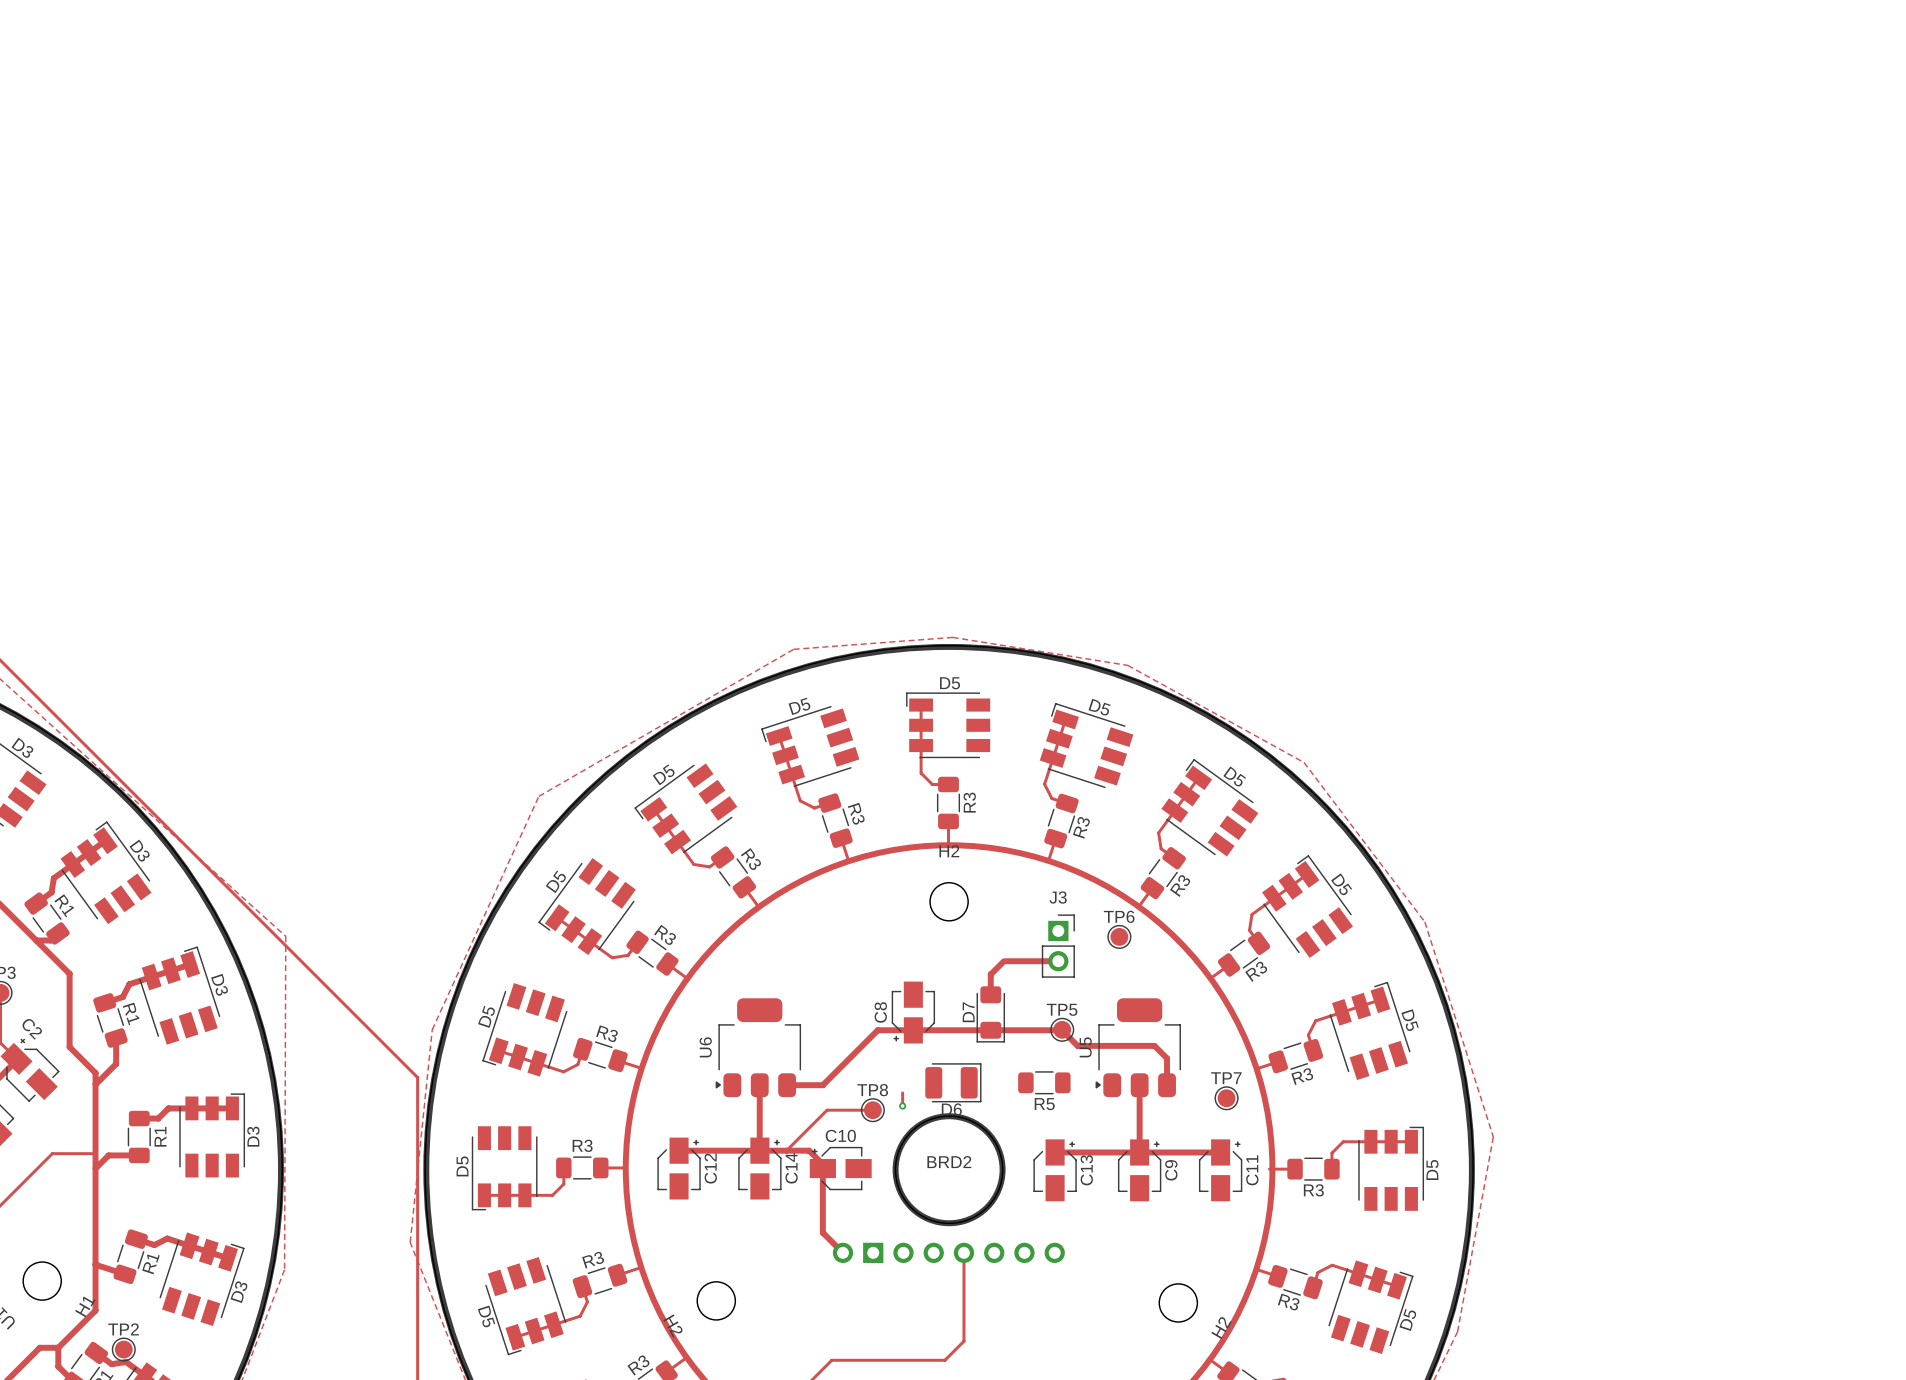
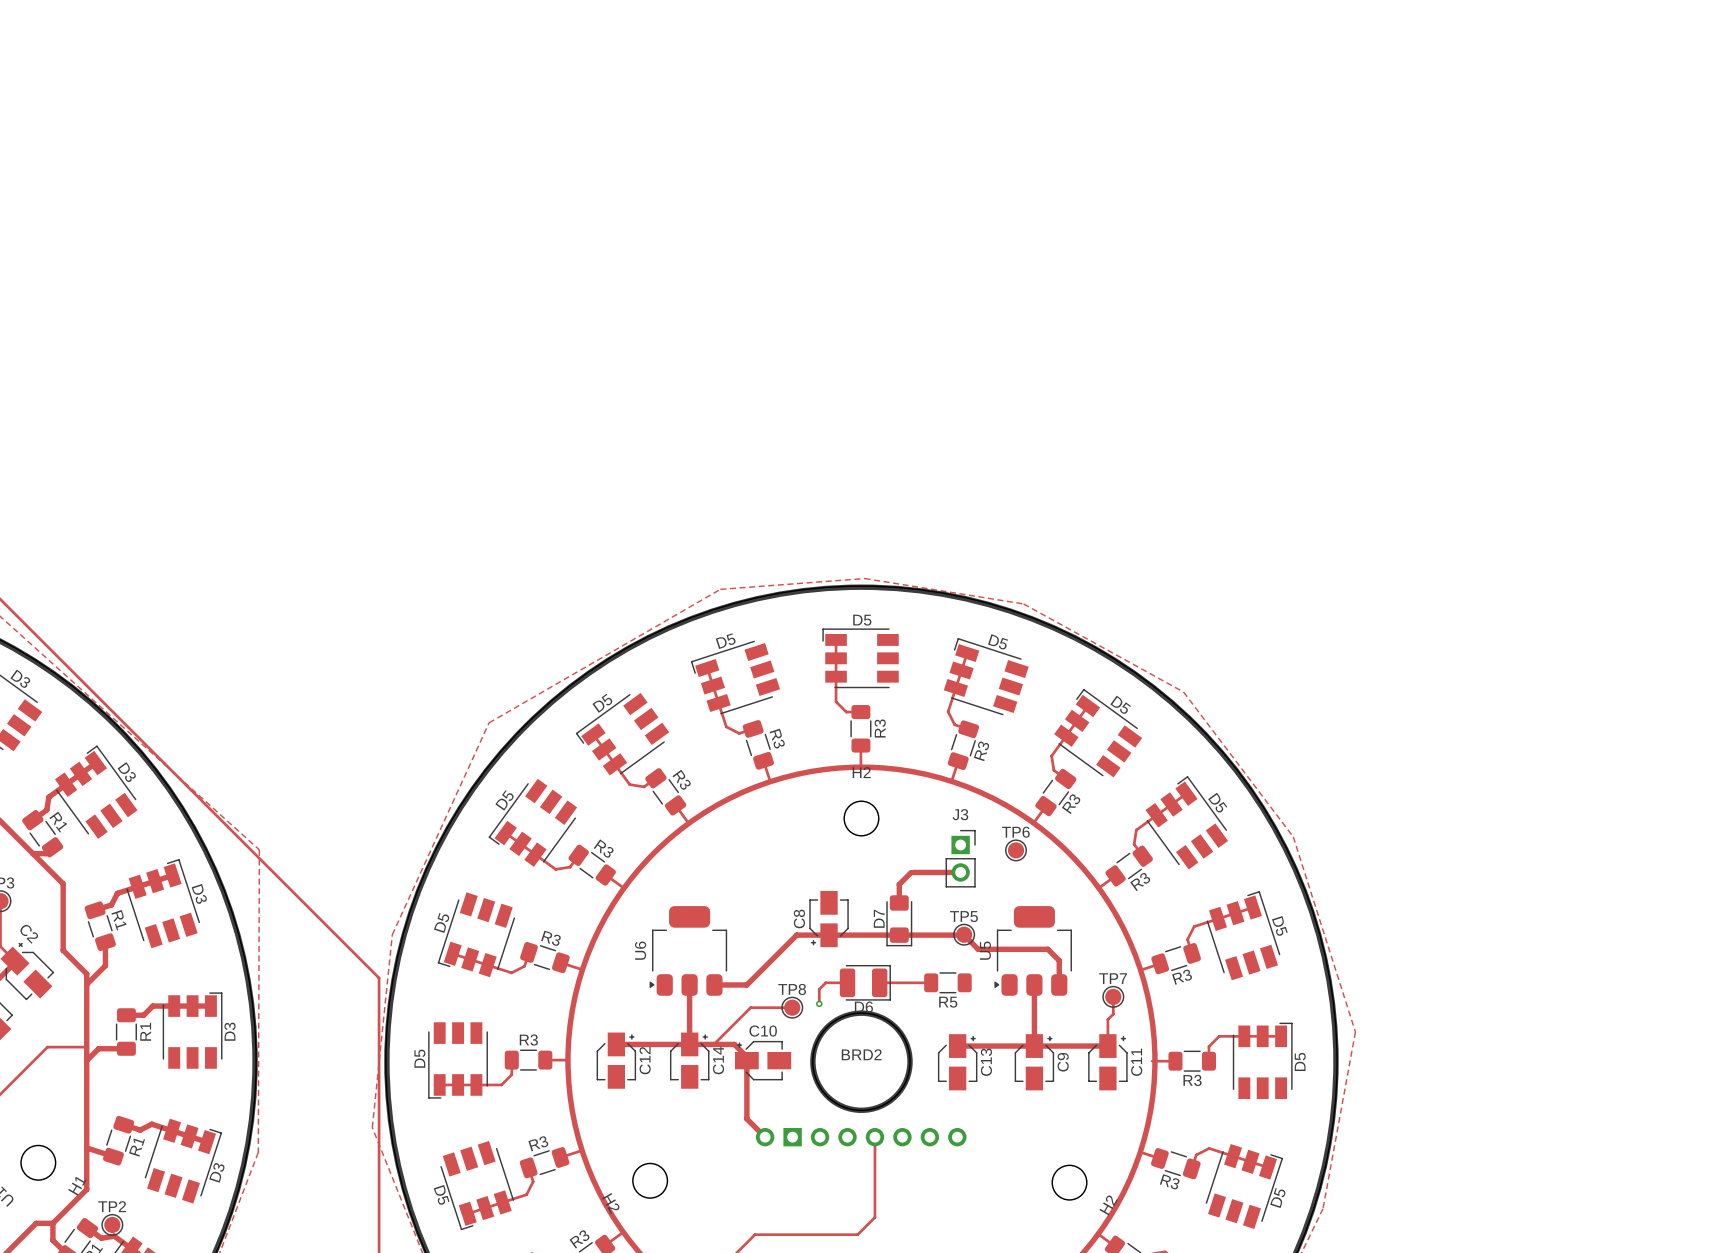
track: none -> (847, 982) (825, 982) (819, 989) (819, 992)
track: none -> (879, 982) (931, 982)
track: none -> (1113, 996) (1113, 1014) (1107, 1019) (1107, 1046)

